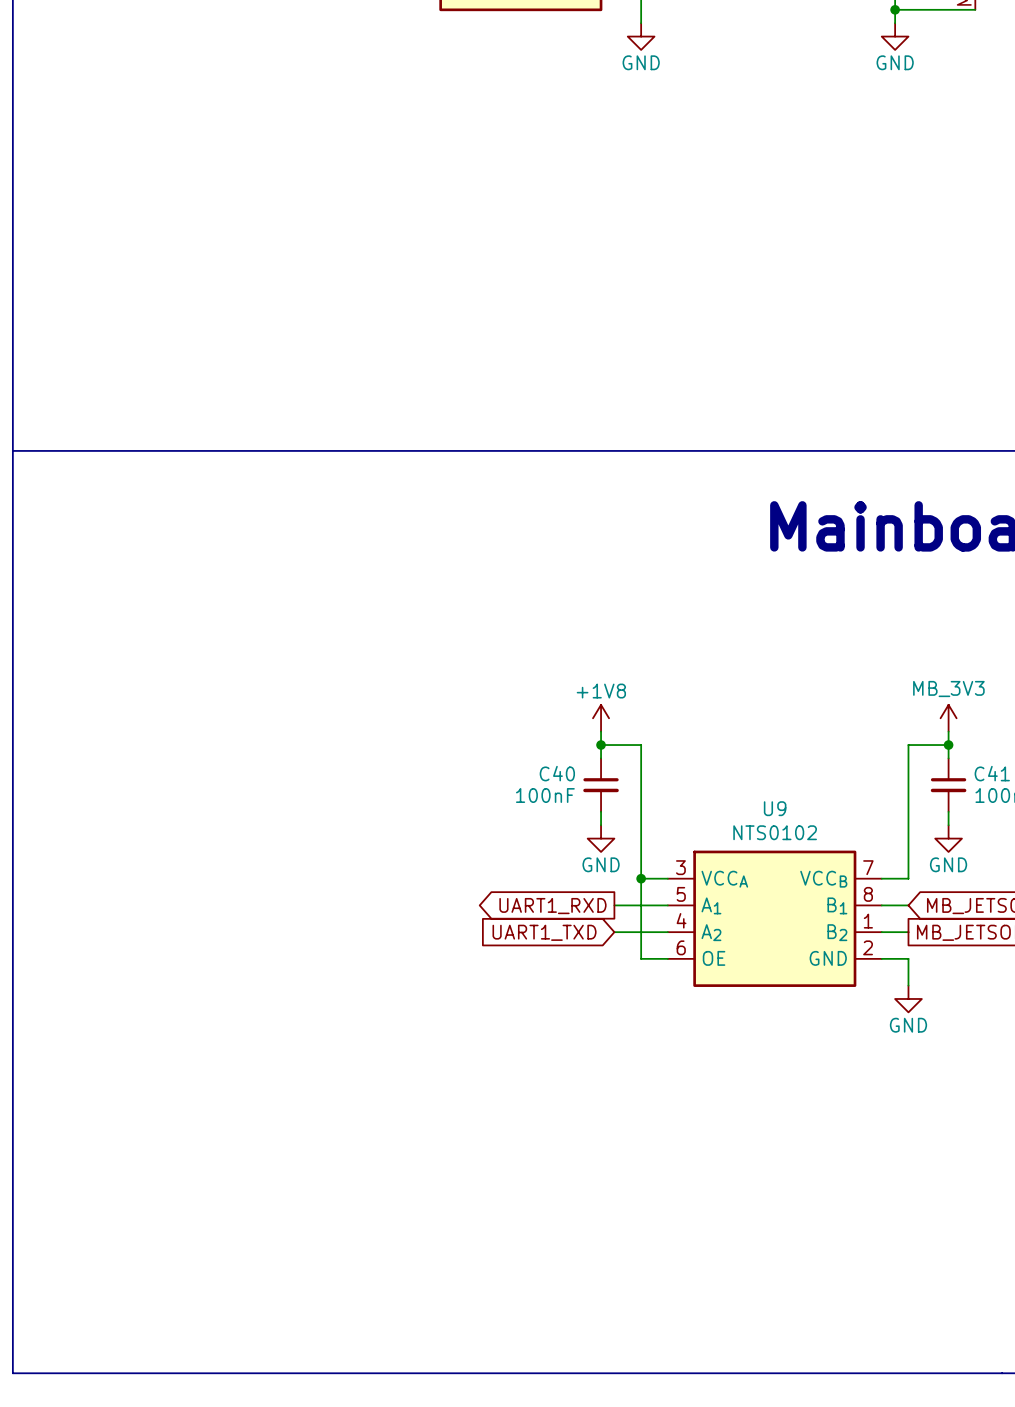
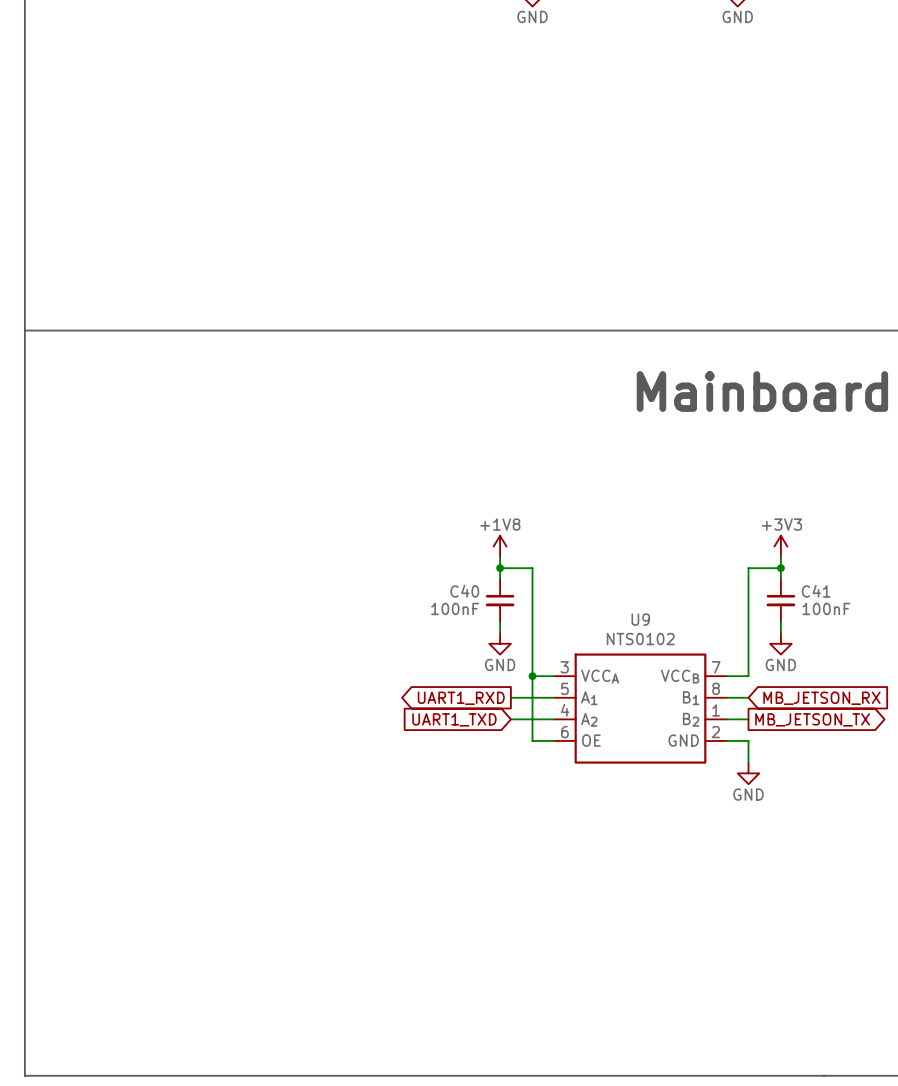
power symbol: MB_3V3 (948, 718) -> +3V3 (780, 546)

